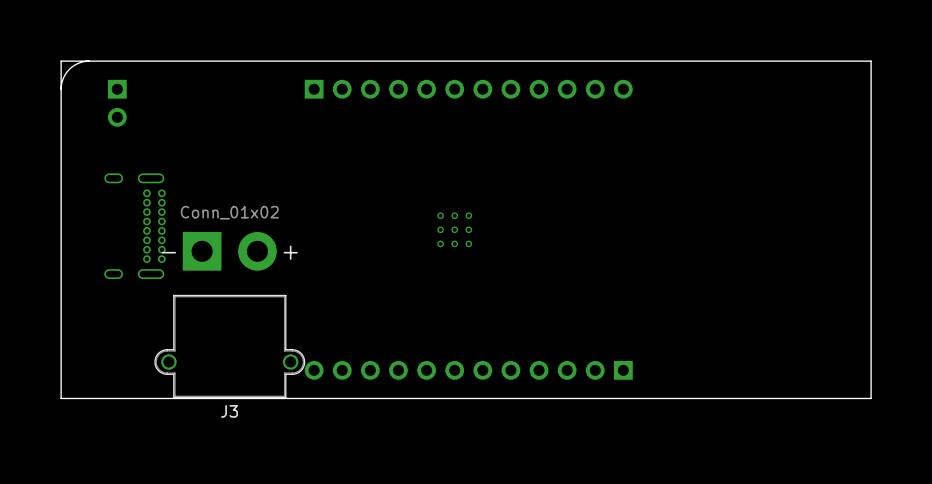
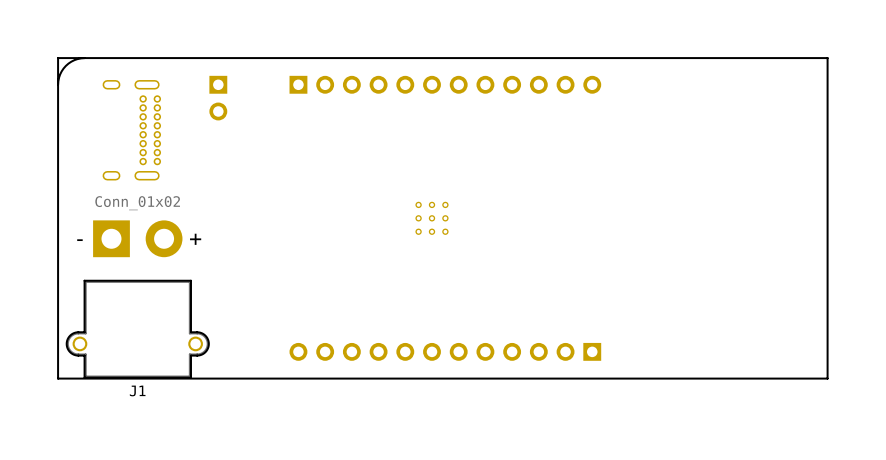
part position: (117, 103) -> (218, 98)
part position: (135, 226) -> (131, 130)
J1: none -> Conn_01x02 (137, 299)
J3: Conn_01x02 (229, 315) -> none

